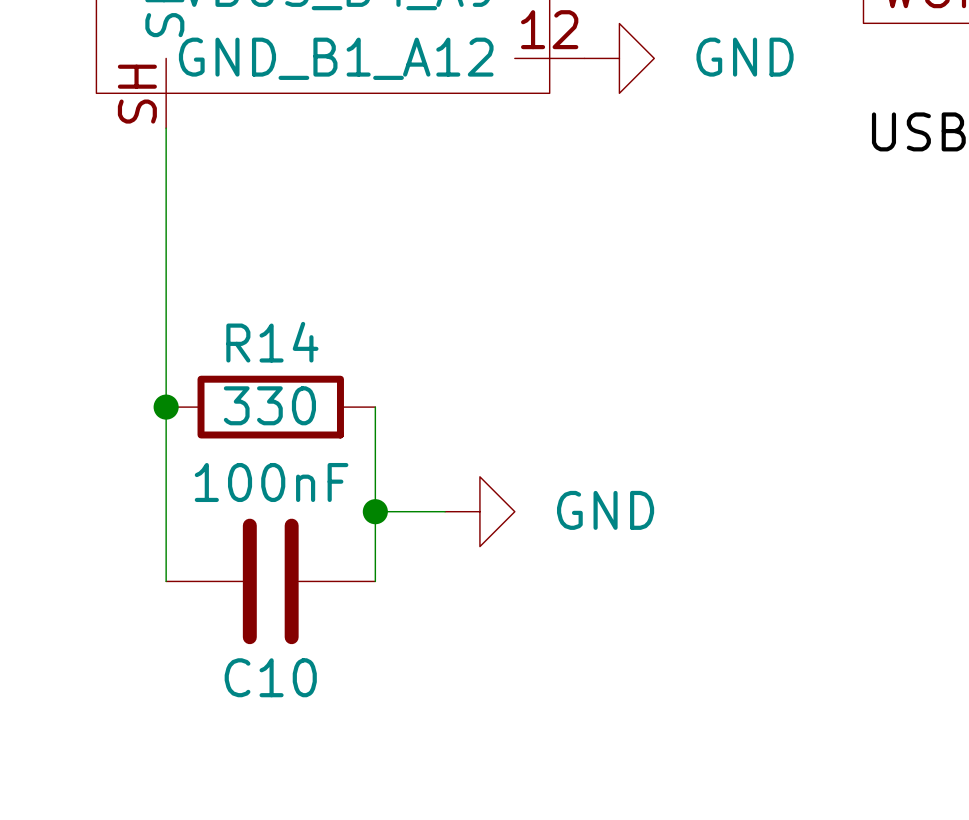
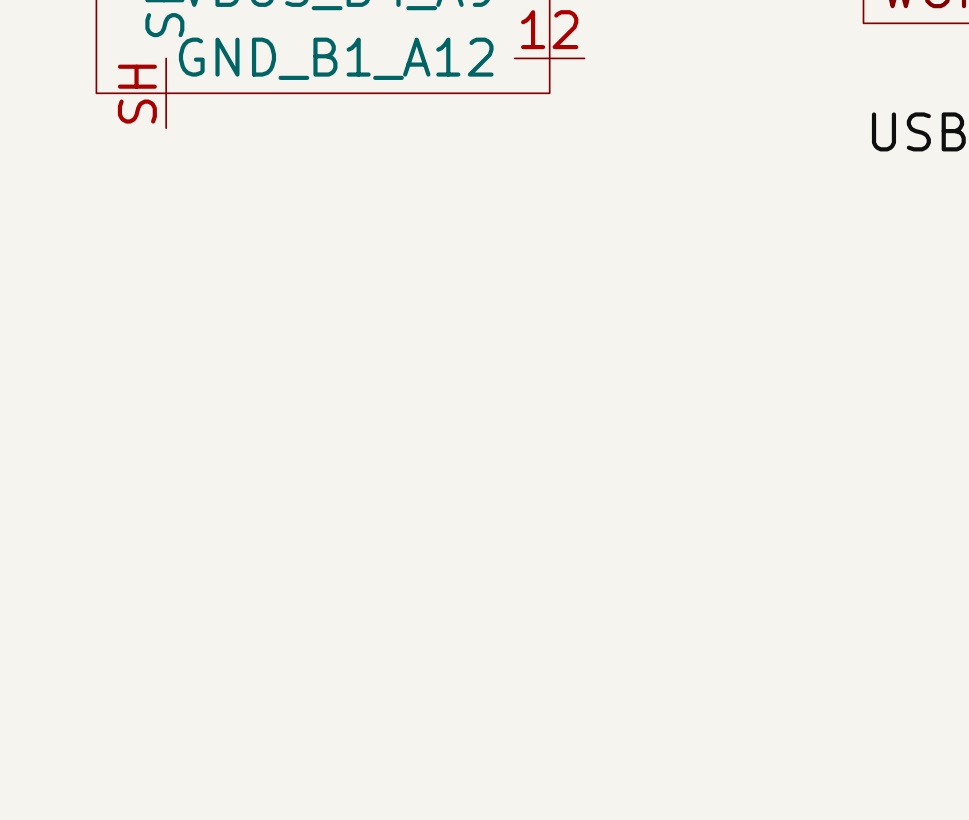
power symbol: GND (619, 58) -> none
wire: (166, 128) (166, 581) -> none
junction: (166, 407) -> none
R14: 330 (270, 407) -> none
wire: (375, 407) (375, 581) -> none
wire: (375, 511) (445, 511) -> none
junction: (375, 511) -> none
power symbol: GND (479, 511) -> none
C10: 100nF (270, 581) -> none

